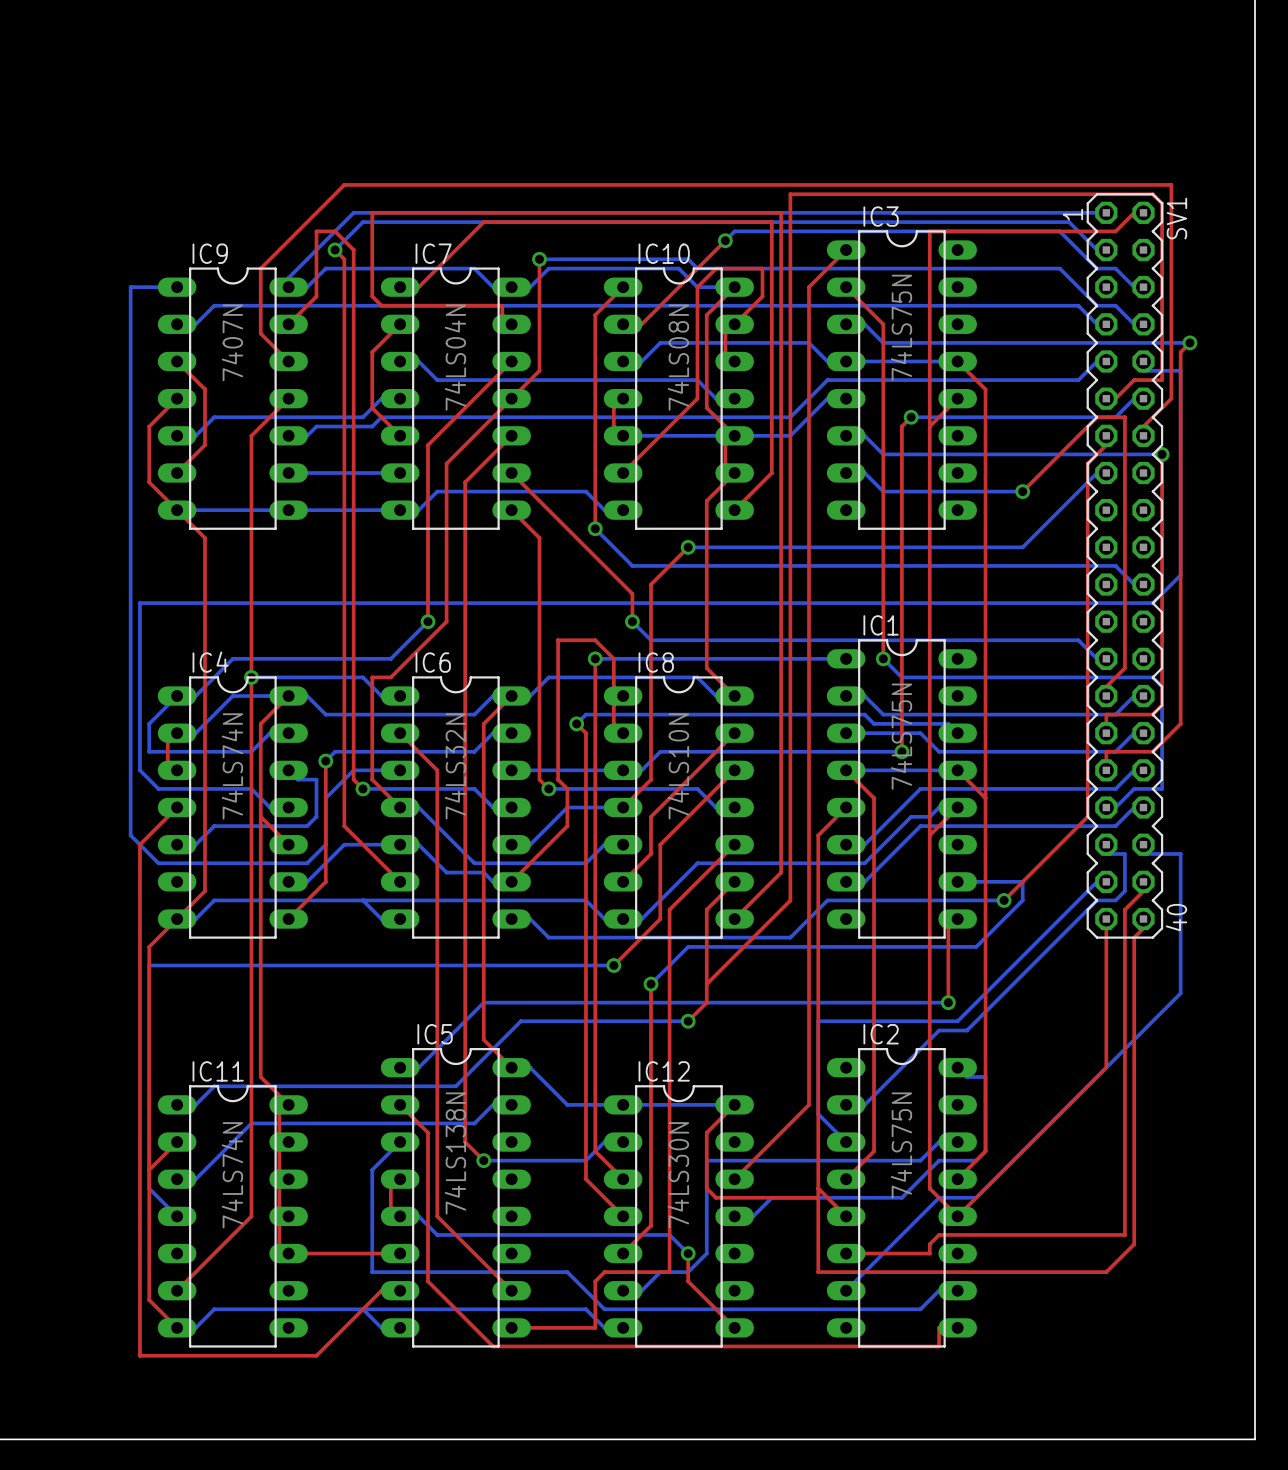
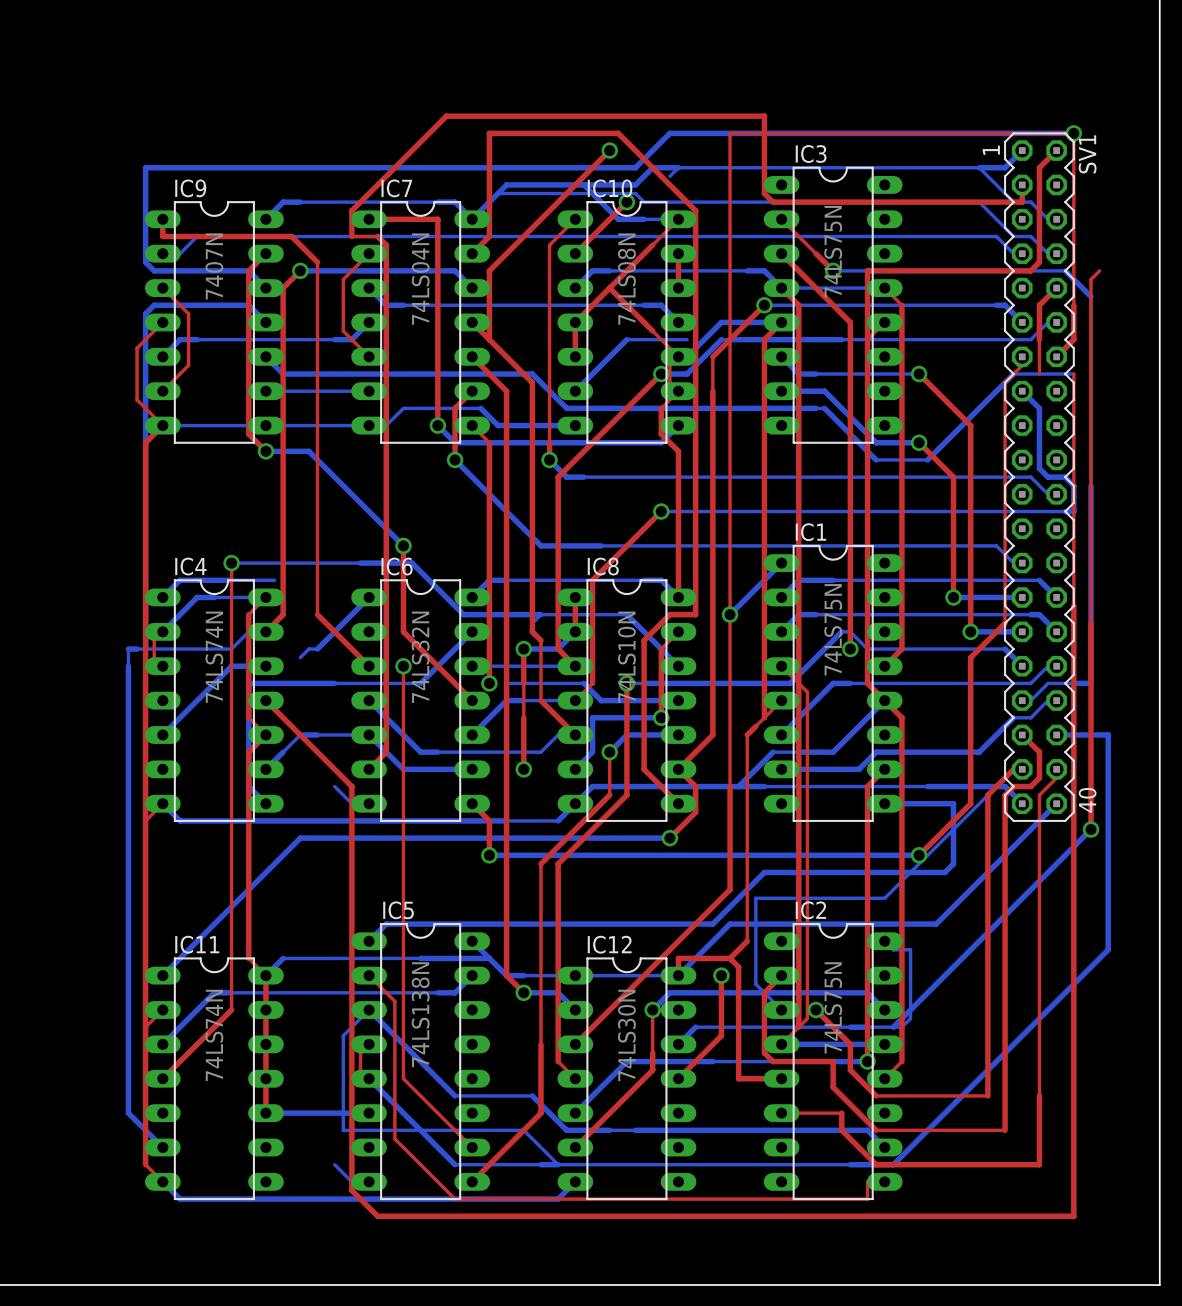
bottom track: none -> (1073, 133) (669, 133) (635, 167) (145, 167) (145, 262) (154, 270) (248, 270) (265, 288)
via: none -> (1073, 133)
top track: none -> (609, 150) (489, 270) (489, 339)
via: none -> (609, 150)
bottom track: (1106, 212) (353, 212) (288, 277) (288, 287) (307, 287) (325, 268) -> (1022, 150) (1005, 167) (979, 167)
top track: (1143, 212) (1134, 212) (1115, 231) (929, 231) (929, 1188) (957, 1216) -> (1056, 150) (1039, 167) (1039, 262) (1030, 270) (867, 270) (867, 683) (901, 717) (901, 1061)
top track: (725, 240) (641, 324) (623, 324) -> (626, 202) (575, 253)
via: (725, 240) -> none
top track: (335, 249) (344, 259) (344, 333) -> (162, 219) (162, 236) (291, 236) (317, 262)
bottom track: (335, 249) (362, 222) (1069, 222) (1097, 249) (1106, 249) -> none
via: (335, 249) -> none
bottom track: none -> (583, 184) (618, 219) (644, 219)
top track: (846, 249) (808, 287) (808, 844) -> (755, 726) (747, 734)
top track: none -> (1022, 184) (1022, 202) (773, 202) (764, 193) (764, 116) (446, 116) (351, 210) (351, 236)
top track: (539, 259) (539, 370) (446, 463) (446, 621) (390, 677) (372, 677) (372, 779) (400, 807) -> none
via: (539, 259) -> none
bottom track: none -> (300, 202) (283, 202) (265, 219)
bottom track: (474, 268) (493, 287) (530, 287) (548, 268) (678, 268) (697, 287) -> (437, 202) (455, 202) (472, 219) (506, 184) (635, 184) (652, 167) (678, 167)
via: none -> (626, 202)
bottom track: (177, 287) (130, 287) (130, 835) (158, 863) (307, 863) -> none
top track: (418, 287) (483, 222) (771, 222) (771, 435) -> (386, 219) (437, 219) (437, 425)
top track: (381, 305) (372, 296) (372, 212) (781, 212) (781, 872) (734, 919) -> (472, 253) (489, 236) (489, 133) (618, 133) (695, 210) (695, 614) (669, 614) (644, 640) (644, 769) (678, 803)
top track: (409, 305) (502, 305) (502, 315) (511, 324) -> (377, 236) (386, 245) (386, 752) (369, 769)
top track: (706, 315) (706, 407) -> (609, 288) (652, 331)
top track: (288, 324) (316, 296) (316, 231) (335, 231) (353, 249) (353, 779) (362, 788) -> (265, 253) (248, 270) (248, 434) (265, 451)
top track: none -> (781, 253) (850, 322) (850, 649)
bottom track: (846, 324) (864, 324) (883, 342) (901, 342) -> none
top track: (883, 324) (883, 658) -> (815, 253) (833, 270)
top track: none -> (300, 270) (283, 288) (283, 614) (265, 631)
bottom track: none -> (300, 270) (455, 270) (472, 288)
via: none -> (300, 270)
bottom track: (660, 342) (641, 361) (623, 361) -> (609, 270) (592, 270) (575, 288)
bottom track: (808, 342) (827, 361) (846, 361) -> (747, 270) (764, 270) (781, 288)
via: none -> (833, 270)
bottom track: (1152, 342) (1189, 342) -> none
via: (1189, 342) -> none
top track: (288, 361) (260, 333) (260, 268) (344, 184) (1171, 184) (1171, 398) (1143, 426) (1143, 435) -> none
bottom track: (400, 361) (418, 361) (437, 380) -> (369, 288) (386, 305) (403, 305)
top track: (511, 361) (428, 445) (428, 621) -> none
top track: (734, 361) (725, 352) (725, 333) (762, 296) (762, 268) (716, 268) (697, 287) (697, 398) (623, 473) -> (678, 288) (678, 253)
top track: none -> (781, 288) (798, 305) (798, 1027)
bottom track: (1106, 361) (1097, 361) (1078, 380) -> (1022, 322) (1005, 305) (996, 305)
bottom track: (1143, 361) (1143, 370) (1180, 370) -> (1065, 270) (1091, 296)
bottom track: (697, 380) (716, 398) (734, 398) -> (644, 305) (661, 305) (678, 322)
top track: none -> (764, 305) (712, 356)
bottom track: (827, 380) (790, 417) -> (841, 339) (730, 339)
via: none -> (764, 305)
top track: (976, 380) (985, 389) (985, 1151) (957, 1179) -> (901, 305) (901, 649) (884, 666)
top track: (1162, 380) (1134, 380) (1115, 398) (1106, 398) -> (1073, 305) (1073, 339) (1056, 356)
top track: (288, 398) (251, 435) (251, 658) -> none
bottom track: none -> (265, 322) (248, 305) (154, 305) (145, 313) (145, 649)
bottom track: (400, 398) (381, 398) (362, 417) -> (369, 322) (351, 339) (334, 339)
top track: (623, 398) (613, 407) (613, 426) (623, 435) -> (652, 245) (575, 322) (575, 356)
bottom track: (827, 398) (790, 435) (743, 435) -> (764, 322) (721, 322) (687, 356)
top track: none -> (781, 322) (764, 339) (764, 717)
bottom track: (214, 417) (195, 435) (177, 435) -> (197, 339) (180, 339) (162, 356)
bottom track: (678, 417) (381, 417) (372, 426) (316, 426) (307, 435) (288, 435) -> (815, 408) (566, 408) (532, 374) (283, 374) (265, 356)
bottom track: none -> (626, 339) (575, 391)
bottom track: (743, 417) (781, 417) -> (661, 374) (687, 374) (721, 339)
top track: (911, 417) (901, 426) (901, 751) -> none
via: (911, 417) -> none
top track: (939, 417) (929, 426) -> none
top track: (1124, 417) (1097, 417) (1022, 491) -> (1039, 339) (1039, 305) (1056, 288)
top track: (511, 435) (465, 482) (465, 1142) (483, 1160) -> (472, 356) (506, 391) (506, 975) (523, 992)
bottom track: (623, 435) (734, 435) -> none
bottom track: (846, 435) (864, 435) (883, 454) -> (781, 356) (798, 374) (815, 374)
top track: none -> (661, 374) (558, 477) (558, 649) (575, 666)
via: none -> (661, 374)
top track: none -> (919, 374) (970, 425) (970, 631)
bottom track: (994, 454) (1097, 454) -> none
via: none -> (919, 374)
top track: (1124, 454) (1124, 668) (1106, 686) (1106, 696) -> none
via: (1162, 454) -> none
top track: (511, 473) (632, 593) (632, 621) -> (472, 391) (455, 408) (455, 459)
top track: (771, 473) (734, 510) -> (712, 391) (712, 734) (678, 769) (695, 786) (695, 812) (669, 838)
bottom track: (864, 473) (883, 491) -> (798, 391) (824, 391) (876, 442) (919, 442)
bottom track: (1106, 473) (1097, 473) (1022, 547) (1004, 547) -> (1013, 374) (927, 459)
bottom track: (520, 491) (585, 491) (604, 510) -> (480, 408) (498, 425) (558, 425)
top track: (716, 491) (706, 500) (706, 668) (734, 696) -> (661, 408) (661, 434) (678, 451) (678, 597)
bottom track: (892, 491) (1022, 491) -> (824, 408) (876, 459)
via: (1022, 491) -> none
top track: (177, 510) (204, 538) (204, 891) (177, 919) -> (162, 425) (145, 442) (145, 1164)
bottom track: none -> (437, 425) (455, 442) (661, 442) (678, 425)
via: none -> (437, 425)
top track: (530, 528) (539, 538) (539, 779) (548, 788) -> (489, 442) (489, 683)
top track: none -> (549, 442) (549, 459)
bottom track: (595, 528) (632, 565) -> (549, 459) (566, 477) (583, 477)
via: (595, 528) -> none
top track: none -> (919, 442) (953, 477) (953, 597)
via: none -> (919, 442)
bottom track: none -> (265, 451) (308, 451) (403, 545)
via: none -> (265, 451)
via: none -> (455, 459)
via: none -> (549, 459)
top track: (688, 547) (651, 584) (651, 779) (641, 788) -> (661, 511) (592, 580) (592, 683)
bottom track: (688, 547) (948, 547) -> none
via: (688, 547) -> none
bottom track: (1180, 575) (1152, 603) -> (1022, 391) (1039, 408) (1039, 468) (1048, 477) (1065, 477) (1073, 485) (1073, 511) (1065, 511)
bottom track: none -> (1091, 485) (1091, 683) (1073, 683)
bottom track: (716, 603) (139, 603) (139, 751) -> none
via: none -> (661, 511)
bottom track: (428, 621) (390, 658) -> (540, 614) (463, 614) (412, 563) (360, 563)
via: (428, 621) -> none
bottom track: (632, 621) (651, 640) -> (455, 459) (540, 545) (601, 545)
via: (632, 621) -> none
top track: none -> (403, 545) (403, 631) (472, 700)
via: none -> (403, 545)
bottom track: (251, 658) (232, 658) (195, 696) (177, 696) (149, 723) (149, 751) -> (128, 649) (137, 649)
via: none -> (231, 563)
top track: (595, 658) (595, 1151) (623, 1179) -> none
bottom track: (595, 658) (846, 658) -> (730, 614) (781, 563)
via: (595, 658) -> none
bottom track: (883, 658) (901, 677) -> none
via: (883, 658) -> none
bottom track: none -> (231, 580) (180, 580) (162, 597)
via: (251, 677) -> none
bottom track: (297, 677) (362, 677) (381, 696) (400, 696) -> (317, 649) (369, 597)
bottom track: (548, 677) (530, 696) (493, 696) (474, 714) (325, 714) (307, 696) (288, 696) -> (506, 580) (489, 580) (472, 597)
bottom track: (697, 677) (716, 696) (734, 696) -> (644, 580) (661, 580) (678, 597)
bottom track: (1124, 677) (1152, 677) (1162, 686) (1162, 788) -> (1039, 580) (1056, 597)
bottom track: (232, 696) (195, 733) (177, 733) -> (214, 597) (197, 597) (162, 631)
top track: (511, 696) (483, 723) (483, 1039) (511, 1067) -> none
top track: none -> (575, 597) (575, 631)
bottom track: (846, 696) (864, 696) (883, 714) -> (781, 597) (798, 580) (833, 580)
bottom track: none -> (953, 597) (1022, 597)
via: none -> (953, 597)
bottom track: (1143, 696) (1134, 696) (1115, 714) -> (1056, 631) (1039, 614) (1030, 614)
top track: (1162, 705) (1152, 714) (1106, 714) (1106, 733) -> (1073, 606) (1073, 1216) (377, 1216) (351, 1190) (351, 786) (265, 700)
top track: (270, 714) (260, 723) (260, 1076) (270, 1086) -> (265, 734) (248, 752) (248, 958)
top track: (344, 714) (344, 826) (400, 881) -> (317, 614) (369, 666)
bottom track: (678, 714) (864, 714) (874, 723) (948, 723) (957, 733) -> (626, 614) (678, 666)
via: none -> (730, 614)
top track: (576, 723) (585, 733) (585, 742) -> (472, 322) (532, 382) (532, 631) (540, 640)
via: (576, 723) -> none
top track: (1087, 723) (1087, 816) (1004, 900) -> (1005, 623) (970, 657) (970, 803) (919, 855)
top track: (1180, 723) (1152, 751) (1106, 751) (1106, 770) -> (1091, 623) (1091, 829)
top track: (400, 733) (437, 770) -> none
bottom track: (511, 733) (493, 733) (474, 751) (344, 751) -> none
top track: (623, 733) (613, 723) (613, 705) (623, 696) (613, 686) (613, 658) (595, 640) (558, 640) (558, 779) (567, 788) -> (523, 649) (523, 683)
bottom track: none -> (575, 631) (558, 649) (523, 649)
bottom track: (846, 733) (911, 733) -> (781, 631) (798, 614) (815, 614)
bottom track: none -> (970, 631) (1022, 631)
via: none -> (970, 631)
bottom track: (1143, 733) (1134, 733) (1115, 751) (1087, 751) -> (1022, 666) (1005, 649)
via: none -> (523, 649)
top track: (716, 751) (651, 816) (651, 853) (623, 881) -> (661, 649) (661, 717)
bottom track: (901, 751) (660, 751) (641, 770) (623, 770) -> none
via: (901, 751) -> none
via: none -> (850, 649)
top track: (325, 761) (325, 881) (288, 919) -> none
via: (325, 761) -> none
bottom track: (139, 770) (158, 788) (251, 788) (270, 807) (288, 807) -> (128, 666) (128, 1113) (162, 1147)
bottom track: (288, 770) (297, 779) (316, 779) (316, 816) (307, 826) (214, 826) (195, 844) (177, 844) -> (265, 666) (231, 666) (162, 734)
bottom track: (400, 770) (353, 770) (325, 798) (325, 844) -> (317, 734) (300, 734)
via: none -> (403, 666)
top track: (734, 770) (660, 844) (660, 863) -> none
bottom track: (846, 770) (957, 770) -> none
top track: (957, 770) (985, 798) -> none
bottom track: none -> (334, 683) (248, 683) (248, 786) (265, 803)
via: (362, 788) -> none
bottom track: (455, 788) (474, 788) (493, 807) (511, 807) -> (420, 683) (472, 631)
via: none -> (489, 683)
via: (548, 788) -> none
bottom track: (632, 788) (678, 788) -> (583, 683) (601, 700) (661, 700)
top track: none -> (626, 683) (626, 795) (558, 863) (558, 1061)
via: none -> (626, 683)
bottom track: (697, 788) (716, 807) -> (644, 683) (790, 683) (841, 631)
bottom track: (920, 788) (864, 844) (846, 844) -> (850, 683) (833, 683) (781, 734)
top track: (177, 807) (139, 844) (139, 1355) (316, 1355) (381, 1290) (400, 1290) -> none
bottom track: (400, 807) (418, 807) (474, 863) -> (369, 700) (420, 752) (437, 752)
bottom track: (567, 807) (530, 844) (511, 844) -> (523, 700) (506, 700) (472, 734)
top track: (585, 807) (585, 984) -> (540, 700) (575, 734)
top track: (957, 807) (929, 835) -> none
bottom track: (957, 807) (939, 807) (929, 816) (911, 816) (864, 863) -> (884, 700) (833, 752) (798, 752)
top track: (260, 816) (270, 826) -> (248, 614) (248, 717)
top track: (567, 826) (511, 881) -> (523, 717) (523, 769)
bottom track: none -> (661, 717) (592, 717) (592, 752) (575, 769)
via: none -> (661, 717)
bottom track: (1097, 826) (920, 826) (864, 881) -> (1013, 717) (979, 752) (876, 752) (858, 769) (798, 769)
top track: (818, 835) (818, 1272) (948, 1272) -> (781, 975) (764, 992) (764, 1052) (773, 1061) (833, 1061) (833, 1087) (876, 1130)
bottom track: (344, 844) (307, 881) (288, 881) -> (283, 752) (265, 769)
bottom track: (400, 844) (418, 844) (446, 872) (483, 872) (493, 881) -> (369, 734) (403, 769) (455, 769)
top track: (734, 844) (669, 909) (669, 1272) (604, 1272) (595, 1281) (595, 1327) (511, 1327) -> none
bottom track: none -> (678, 734) (626, 734) (609, 752)
bottom track: (1106, 844) (1106, 853) (1124, 853) (1124, 891) (1115, 900) (1097, 900) (966, 1030) (939, 1030) (864, 1104) (846, 1104) -> none
bottom track: (1143, 844) (1143, 853) (1180, 853) (1180, 993) (976, 1197) (939, 1197) (846, 1290) -> (1056, 734) (1108, 734) (1108, 949) (893, 1164) (850, 1164)
via: none -> (609, 752)
bottom track: (836, 863) (697, 863) (641, 919) (604, 919) (585, 900) (214, 900) (195, 919) (177, 919) -> (506, 820) (180, 820) (162, 803)
bottom track: none -> (773, 752) (738, 786)
via: none -> (523, 769)
top track: (734, 881) (706, 909) (706, 1002) (688, 1021) -> none
top track: none -> (884, 769) (867, 786) (867, 1061)
bottom track: (957, 881) (1022, 881) (1022, 900) (976, 946) (688, 946) (651, 984) -> none
top track: none -> (1022, 769) (1013, 769) (987, 795) (987, 1095)
top track: (790, 900) (706, 984) -> (730, 786) (730, 889) (575, 1044)
bottom track: (827, 900) (790, 937) (604, 937) -> (764, 786) (592, 786) (558, 820)
bottom track: none -> (927, 786) (1005, 786) (1022, 803)
via: (1004, 900) -> none
top track: (660, 909) (660, 919) (613, 965) -> (609, 795) (540, 863)
top track: none -> (472, 803) (489, 820) (489, 855)
bottom track: (511, 919) (530, 919) (548, 937) -> none
top track: (957, 919) (948, 928) (948, 1002) -> none
top track: (1106, 919) (1106, 1067) (976, 1197) -> none
top track: (1143, 919) (1143, 928) (1134, 937) (1134, 1244) (1106, 1272) (1087, 1272) -> (1022, 734) (1039, 752) (1039, 777) (1030, 786) (1013, 786) (1005, 795) (1005, 1130)
bottom track: none -> (1056, 803) (936, 924) (730, 924) (678, 975)
top track: (158, 937) (149, 946) (149, 1300) (158, 1309) -> none
bottom track: none -> (1091, 829) (893, 1027)
via: none -> (1091, 829)
bottom track: none -> (669, 838) (300, 838) (162, 975)
via: none -> (669, 838)
bottom track: (613, 965) (149, 965) (149, 1188) (177, 1216) -> none
via: (613, 965) -> none
bottom track: none -> (489, 855) (919, 855)
via: none -> (489, 855)
via: none -> (919, 855)
top track: (651, 984) (651, 1225) (623, 1253) -> none
via: (651, 984) -> none
bottom track: (948, 1002) (483, 1002) (418, 1067) (400, 1067) -> (884, 803) (953, 803) (953, 863) (944, 872) (764, 872) (712, 924) (386, 924) (369, 941)
via: (948, 1002) -> none
bottom track: (688, 1021) (520, 1021) (455, 1086) -> (489, 958) (420, 958)
via: (688, 1021) -> none
bottom track: (511, 1067) (530, 1067) (567, 1104) -> (472, 941) (506, 975) (523, 975)
top track: (808, 1067) (808, 1104) (734, 1179) -> (747, 941) (730, 958)
bottom track: (307, 1086) (214, 1086) (195, 1104) (177, 1104) -> (283, 958) (265, 975)
top track: (288, 1104) (279, 1114) (279, 1132) (288, 1142) (279, 1151) (279, 1169) (288, 1179) (279, 1188) (279, 1207) (288, 1216) (279, 1225) (279, 1244) (288, 1253) (400, 1253) -> (265, 975) (265, 1113)
bottom track: (511, 1104) (493, 1104) (474, 1123) -> (472, 975) (455, 992) (437, 992)
top track: (734, 1104) (706, 1132) (706, 1142) -> (678, 975) (678, 958) (730, 958)
top track: none -> (721, 975) (721, 1035) (678, 1078)
via: none -> (721, 975)
bottom track: (251, 1123) (195, 1179) (177, 1179) -> (231, 992) (214, 992) (162, 1044)
via: none -> (523, 992)
top track: (251, 1142) (251, 1216) (177, 1290) -> (231, 1010) (162, 1078)
bottom track: (623, 1142) (604, 1142) (585, 1160) (483, 1160) -> (575, 1010) (558, 992) (523, 992)
bottom track: none -> (652, 1010) (669, 992) (867, 992) (884, 1010)
via: none -> (652, 1010)
via: none -> (815, 1010)
bottom track: (957, 1142) (939, 1142) (920, 1160) -> (867, 1027) (850, 1027)
top track: (158, 1160) (149, 1169) -> none
via: (483, 1160) -> none
bottom track: (753, 1160) (706, 1160) (706, 1253) (688, 1272) -> (695, 1027) (678, 1044)
bottom track: (939, 1160) (901, 1197) -> (867, 1061) (833, 1061)
top track: (585, 1179) (604, 1197) -> (540, 1044) (540, 1113) (472, 1181)
bottom track: none -> (781, 1044) (884, 1044)
top track: (706, 1188) (716, 1197) (818, 1197) -> (652, 1052) (652, 1070) (575, 1147)
top track: (818, 1188) (846, 1216) -> (730, 958) (738, 967) (738, 1078) (781, 1078)
bottom track: (771, 1197) (753, 1216) (734, 1216) -> (712, 1061) (626, 1061) (575, 1113)
via: none -> (867, 1061)
bottom track: (400, 1216) (418, 1216) (437, 1234) (493, 1234) -> (369, 1010) (455, 1095)
bottom track: none -> (369, 1078) (455, 1164)
bottom track: (576, 1234) (669, 1234) (688, 1253) -> (532, 1095) (566, 1130) (609, 1130)
top track: (948, 1234) (939, 1234) (929, 1244) (929, 1253) (911, 1253) -> (876, 1095) (850, 1070) (850, 1044) (815, 1010)
top track: (1069, 1234) (1124, 1234) -> (841, 1113) (841, 1130) (876, 1164) (1039, 1164) (1039, 1095)
bottom track: none -> (265, 1113) (369, 1113)
top track: (688, 1253) (688, 1281) (734, 1327) -> none
via: (688, 1253) -> none
bottom track: (660, 1272) (641, 1290) (623, 1290) -> none
bottom track: (957, 1290) (939, 1290) (920, 1309) -> (884, 1147) (867, 1130) (635, 1130)
bottom track: (493, 1309) (214, 1309) (195, 1327) (177, 1327) -> (575, 1181) (558, 1199) (180, 1199) (162, 1181)
bottom track: (585, 1309) (604, 1327) (623, 1327) -> (540, 1164) (558, 1164)

